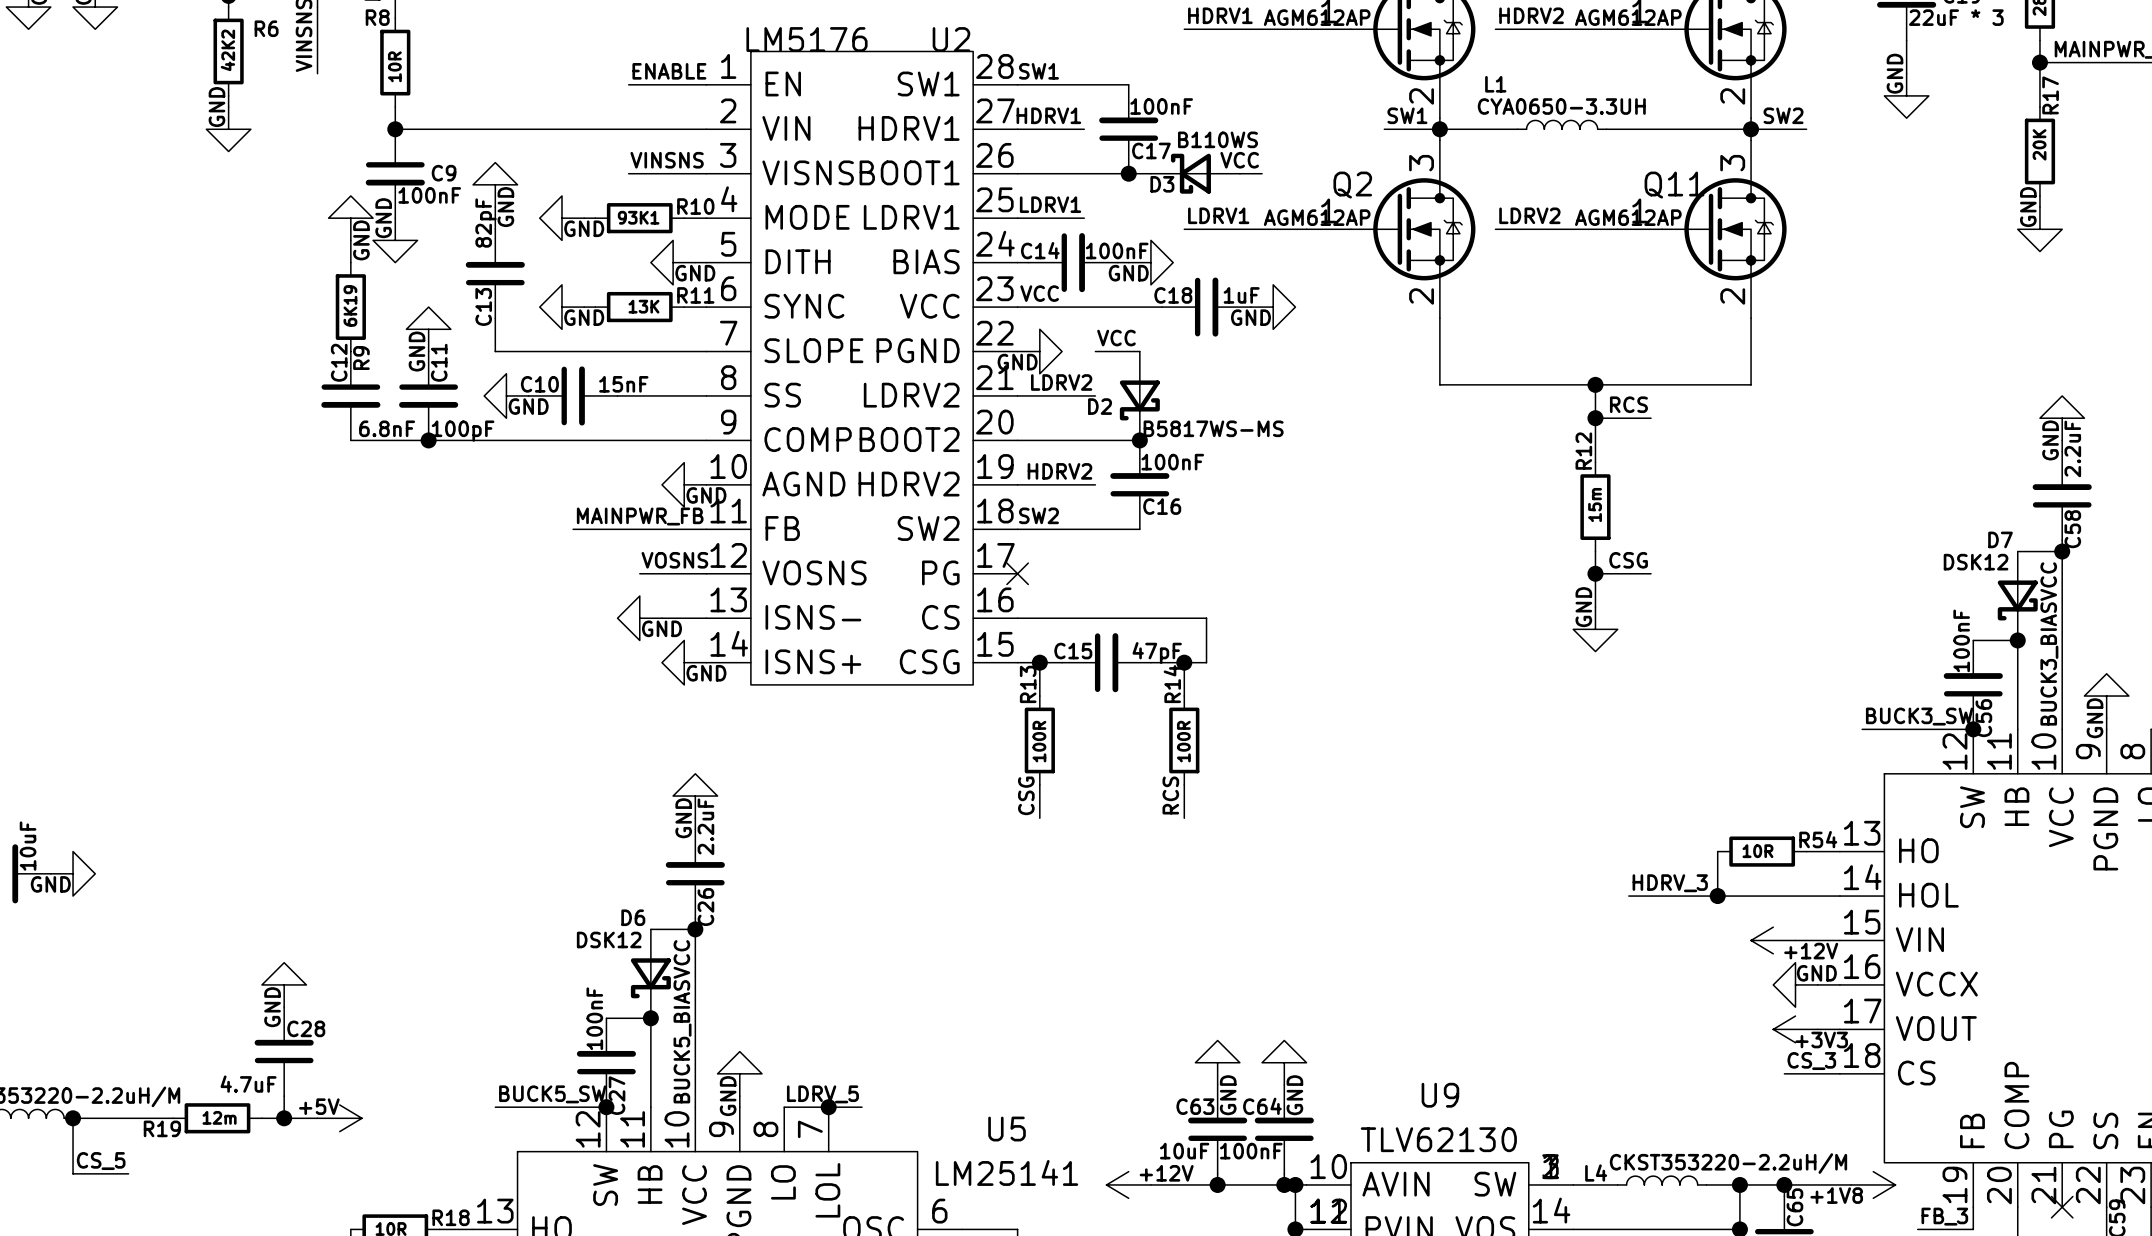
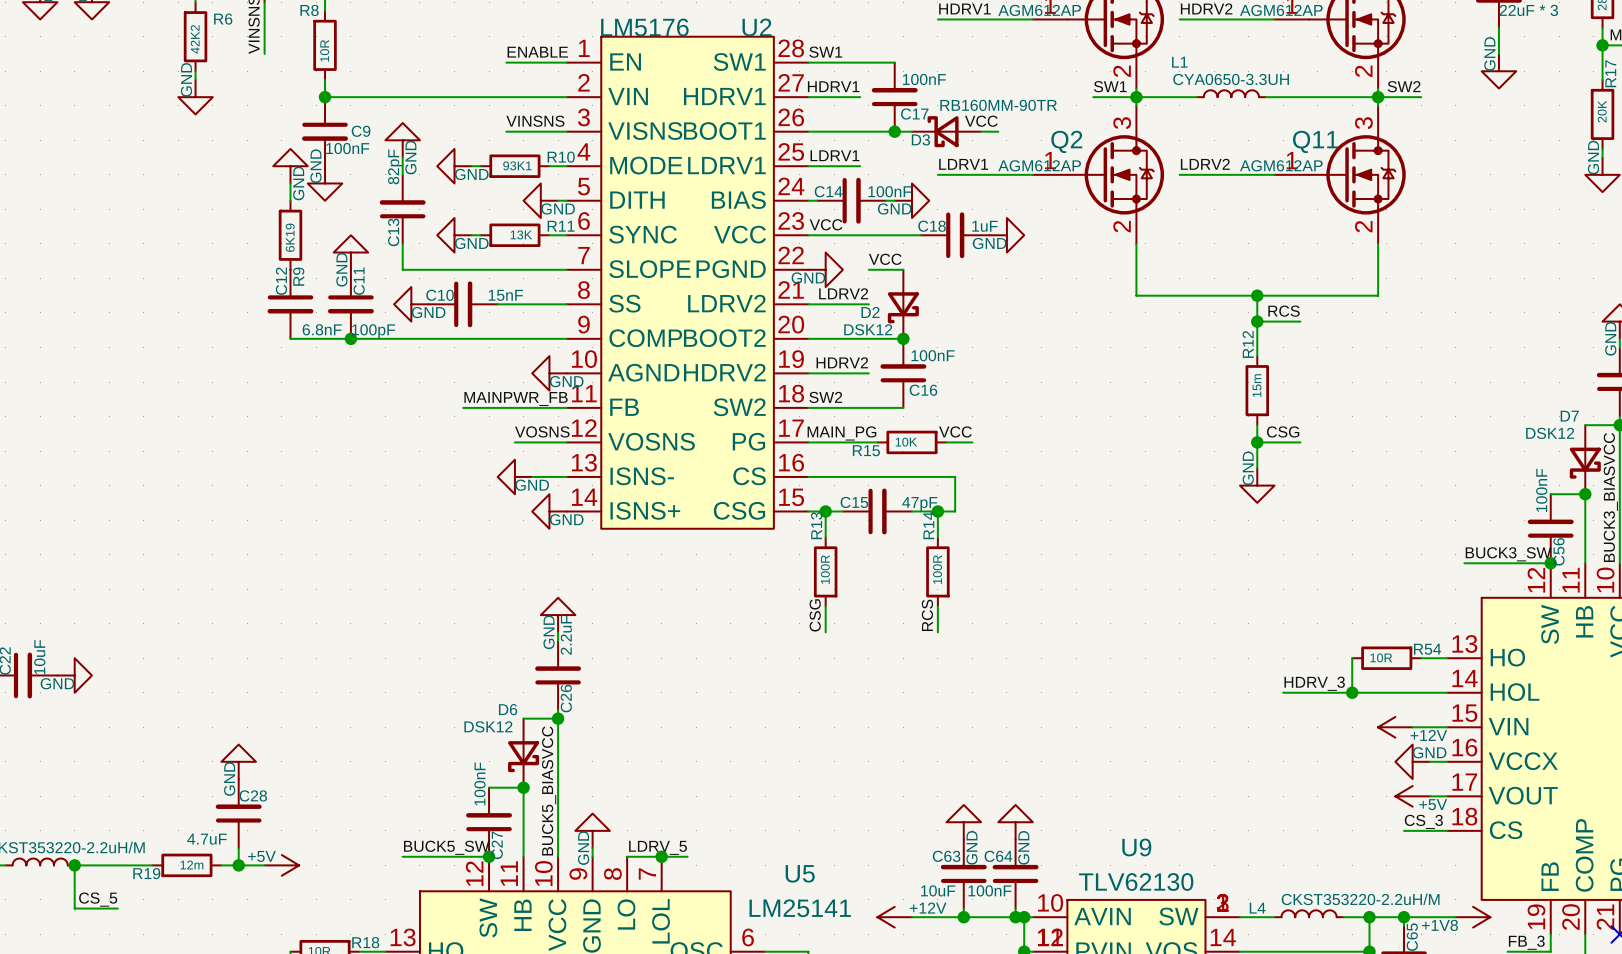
D3 value: B110WS (1217, 139) -> RB160MM-90TR (998, 105)
D2 value: B5817WS-MS (1213, 428) -> DSK12 (868, 329)
label: none -> MAIN_PG (841, 433)
label: none -> VCC (955, 431)
wire: none -> (808, 442) (877, 442)
no-connect mark: (1017, 573) -> none
R15: none -> 10K (911, 442)
wire: none -> (946, 442) (972, 442)
power symbol: +3V3 (1795, 1029) -> +5V (1412, 796)

